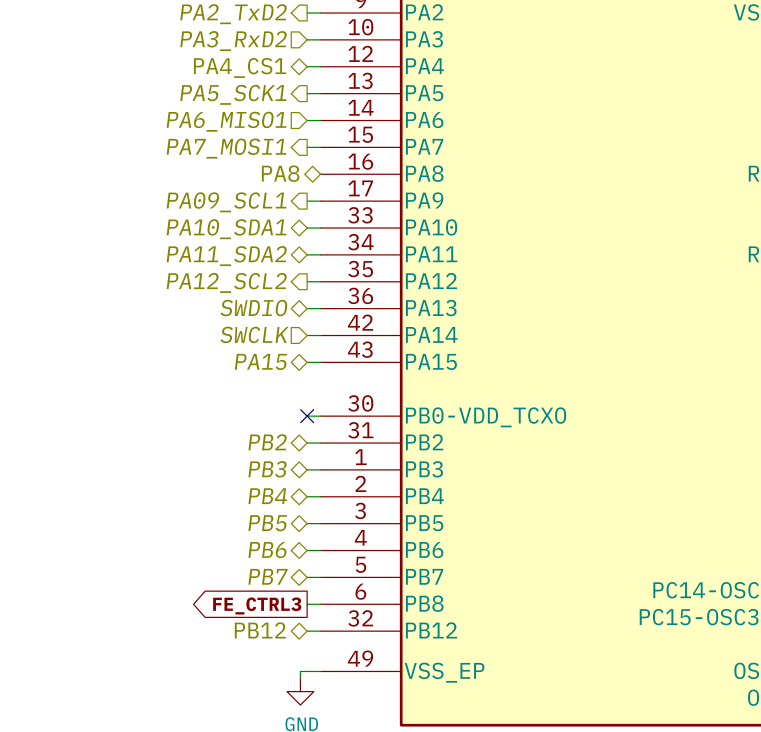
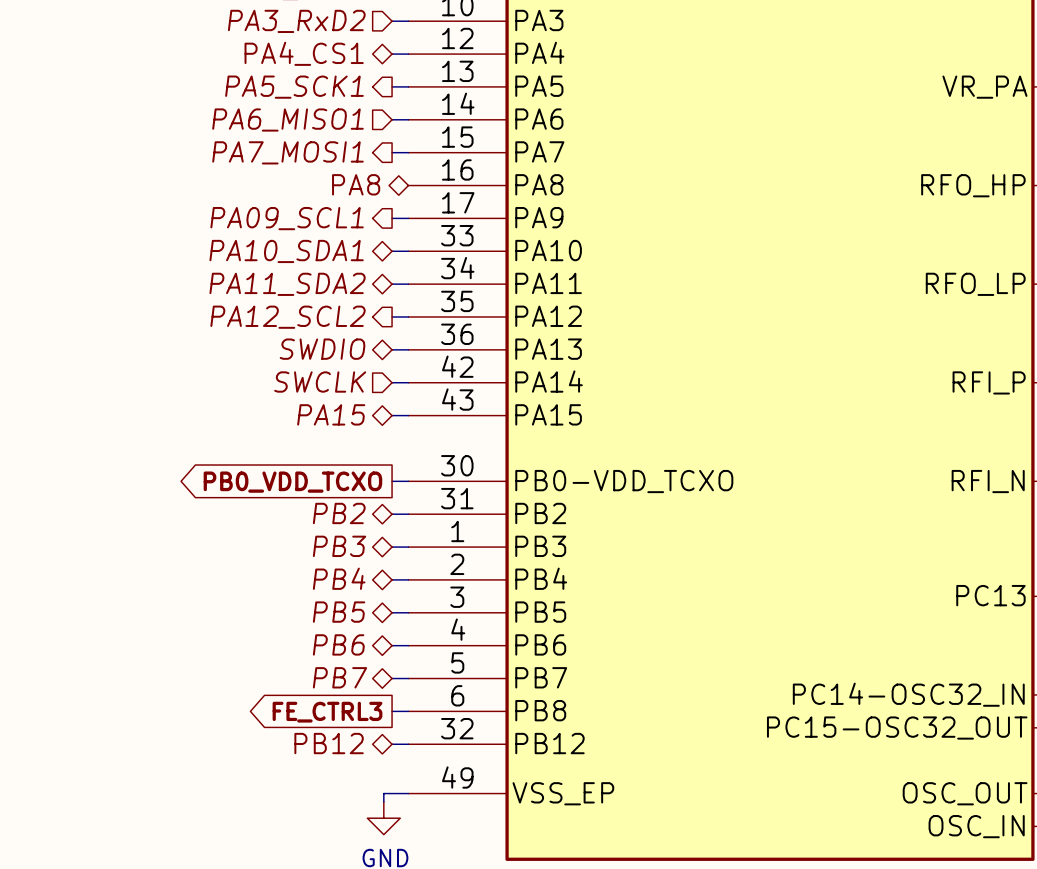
no-connect mark: (307, 416) -> none
global label: none -> PB0_VDD_TCXO (292, 482)

